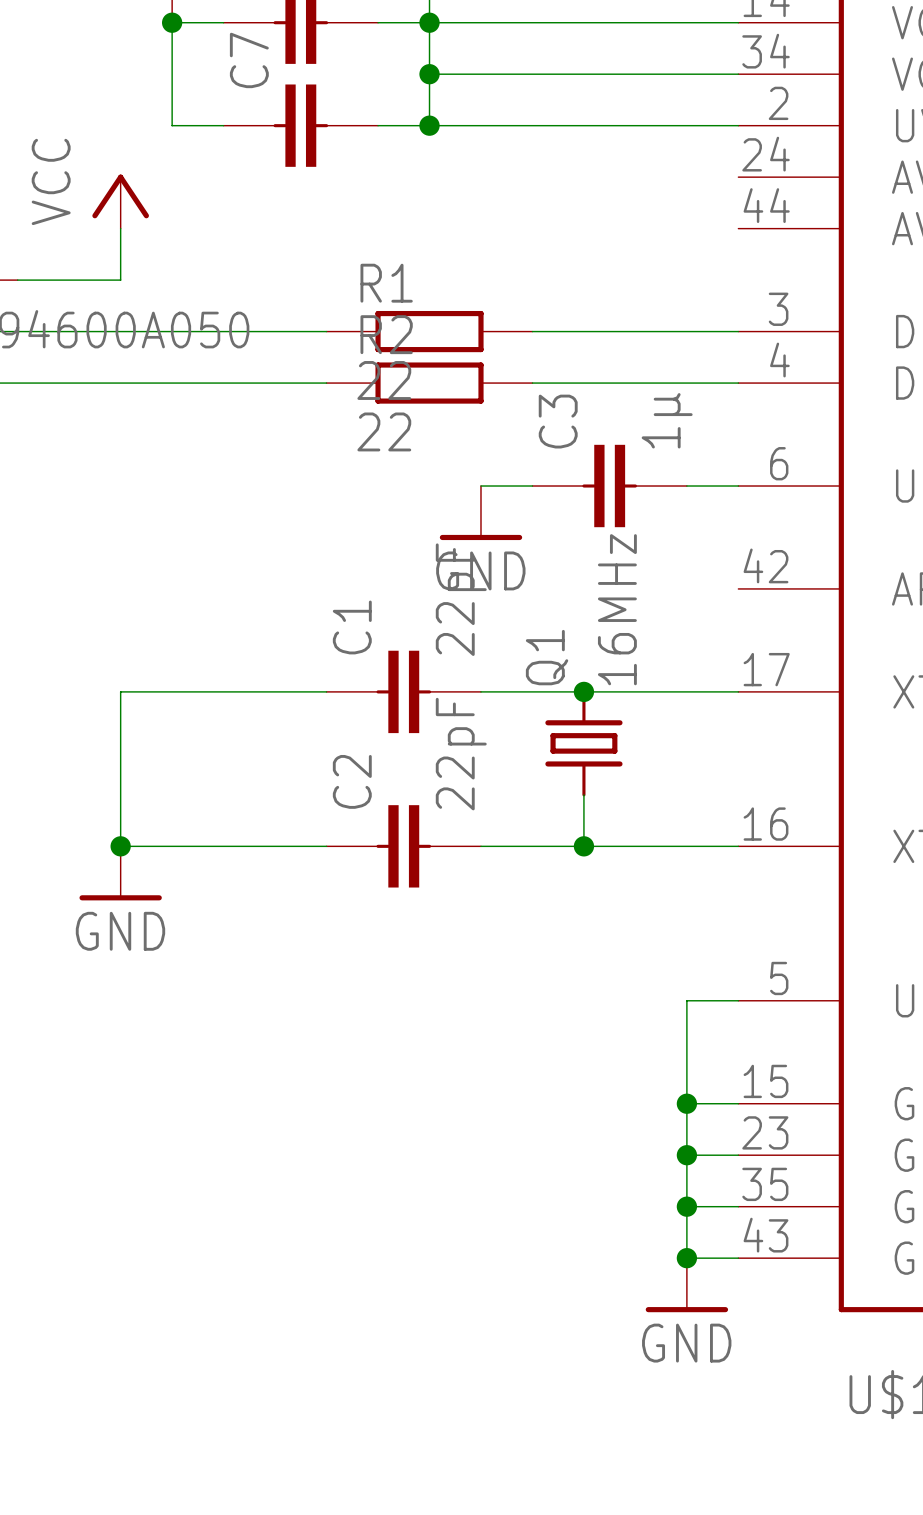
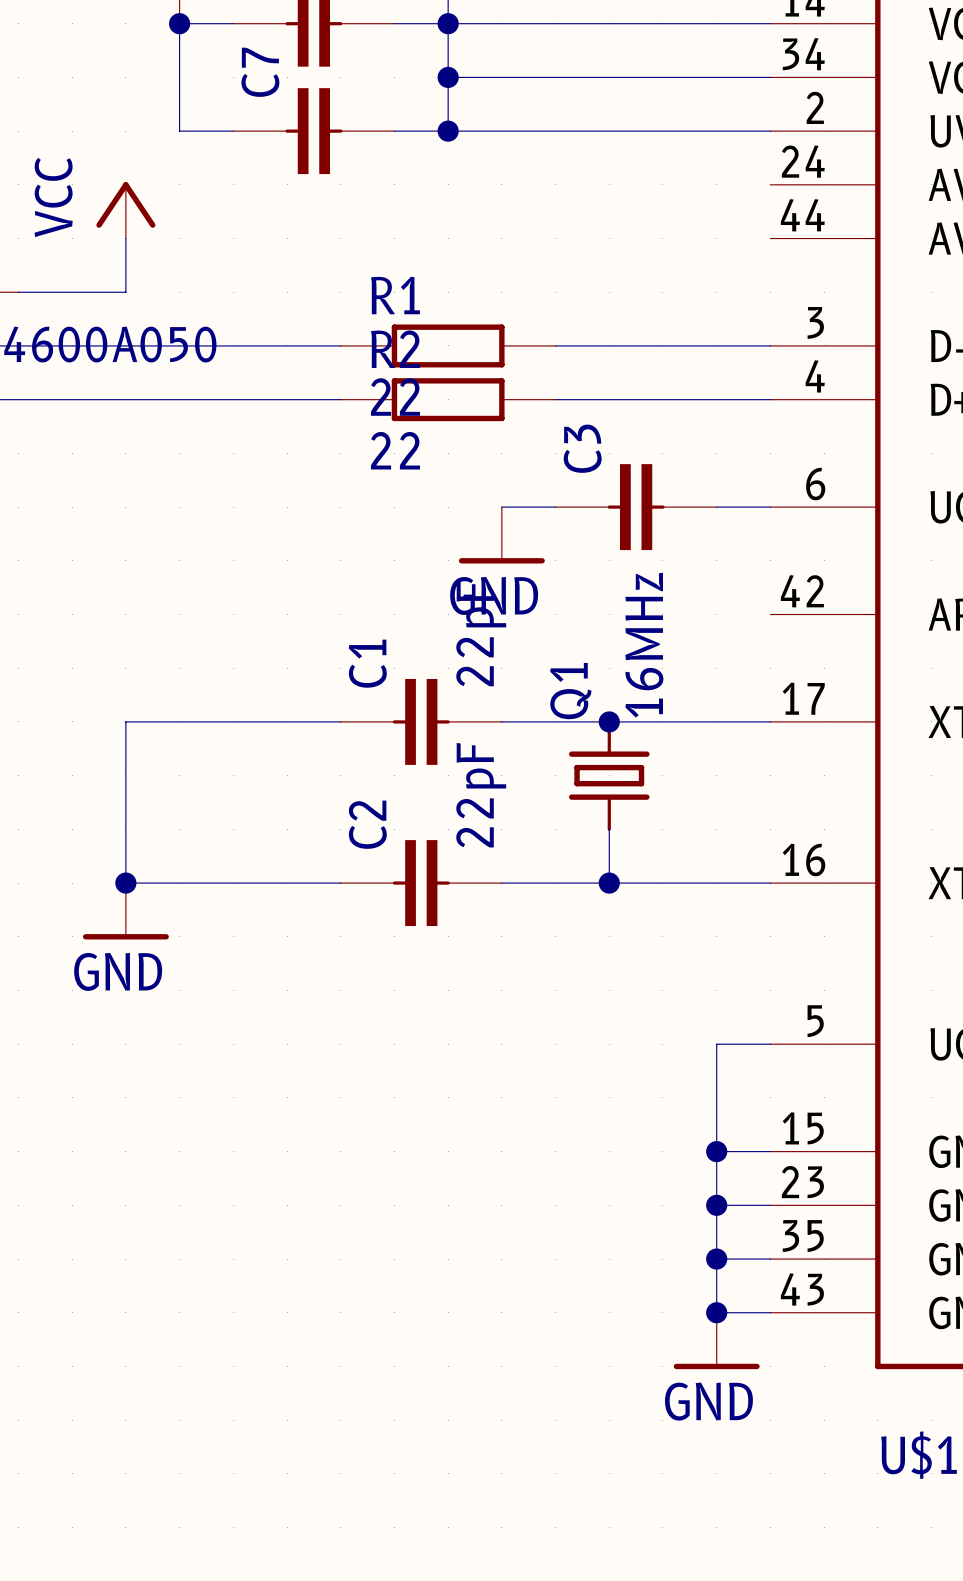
C3 value: 1µ (667, 420) -> none

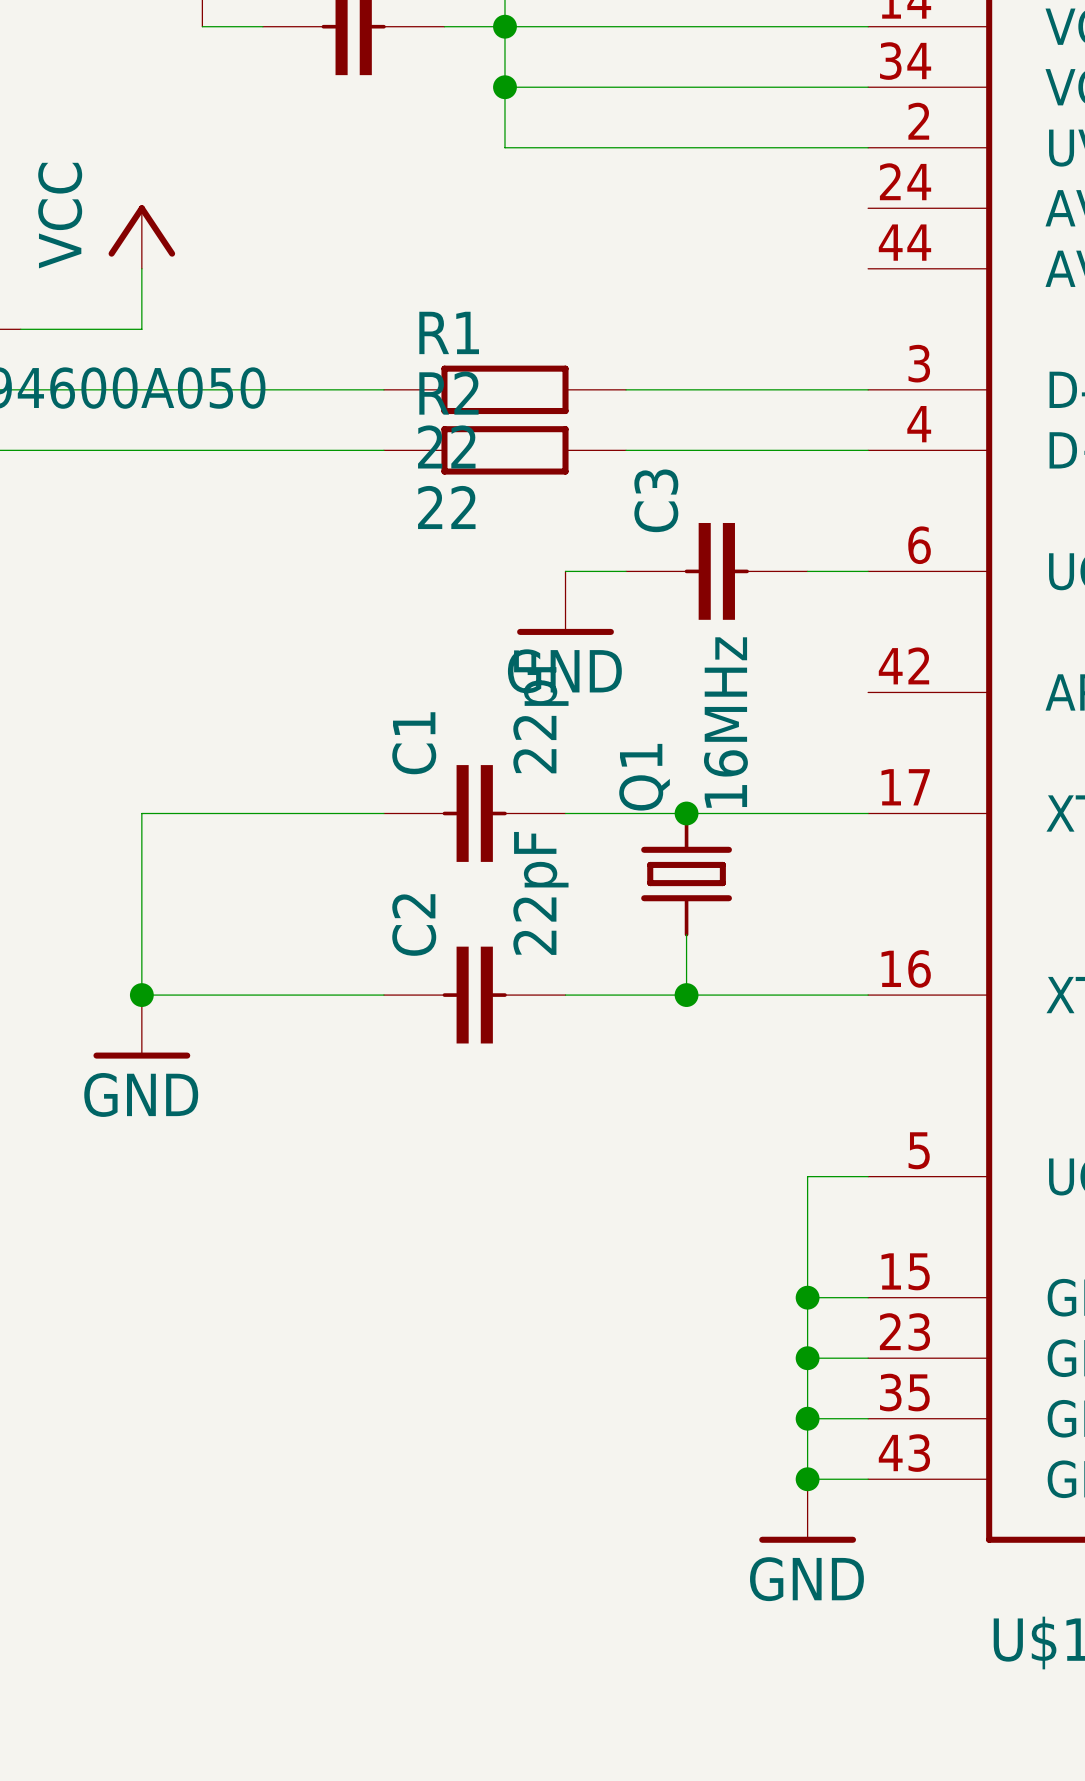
wire: (179, 23) (179, 131) (233, 131) -> none
junction: (179, 23) -> none
C7: (313, 131) -> none
wire: (394, 131) (448, 131) -> none
junction: (448, 131) -> none

